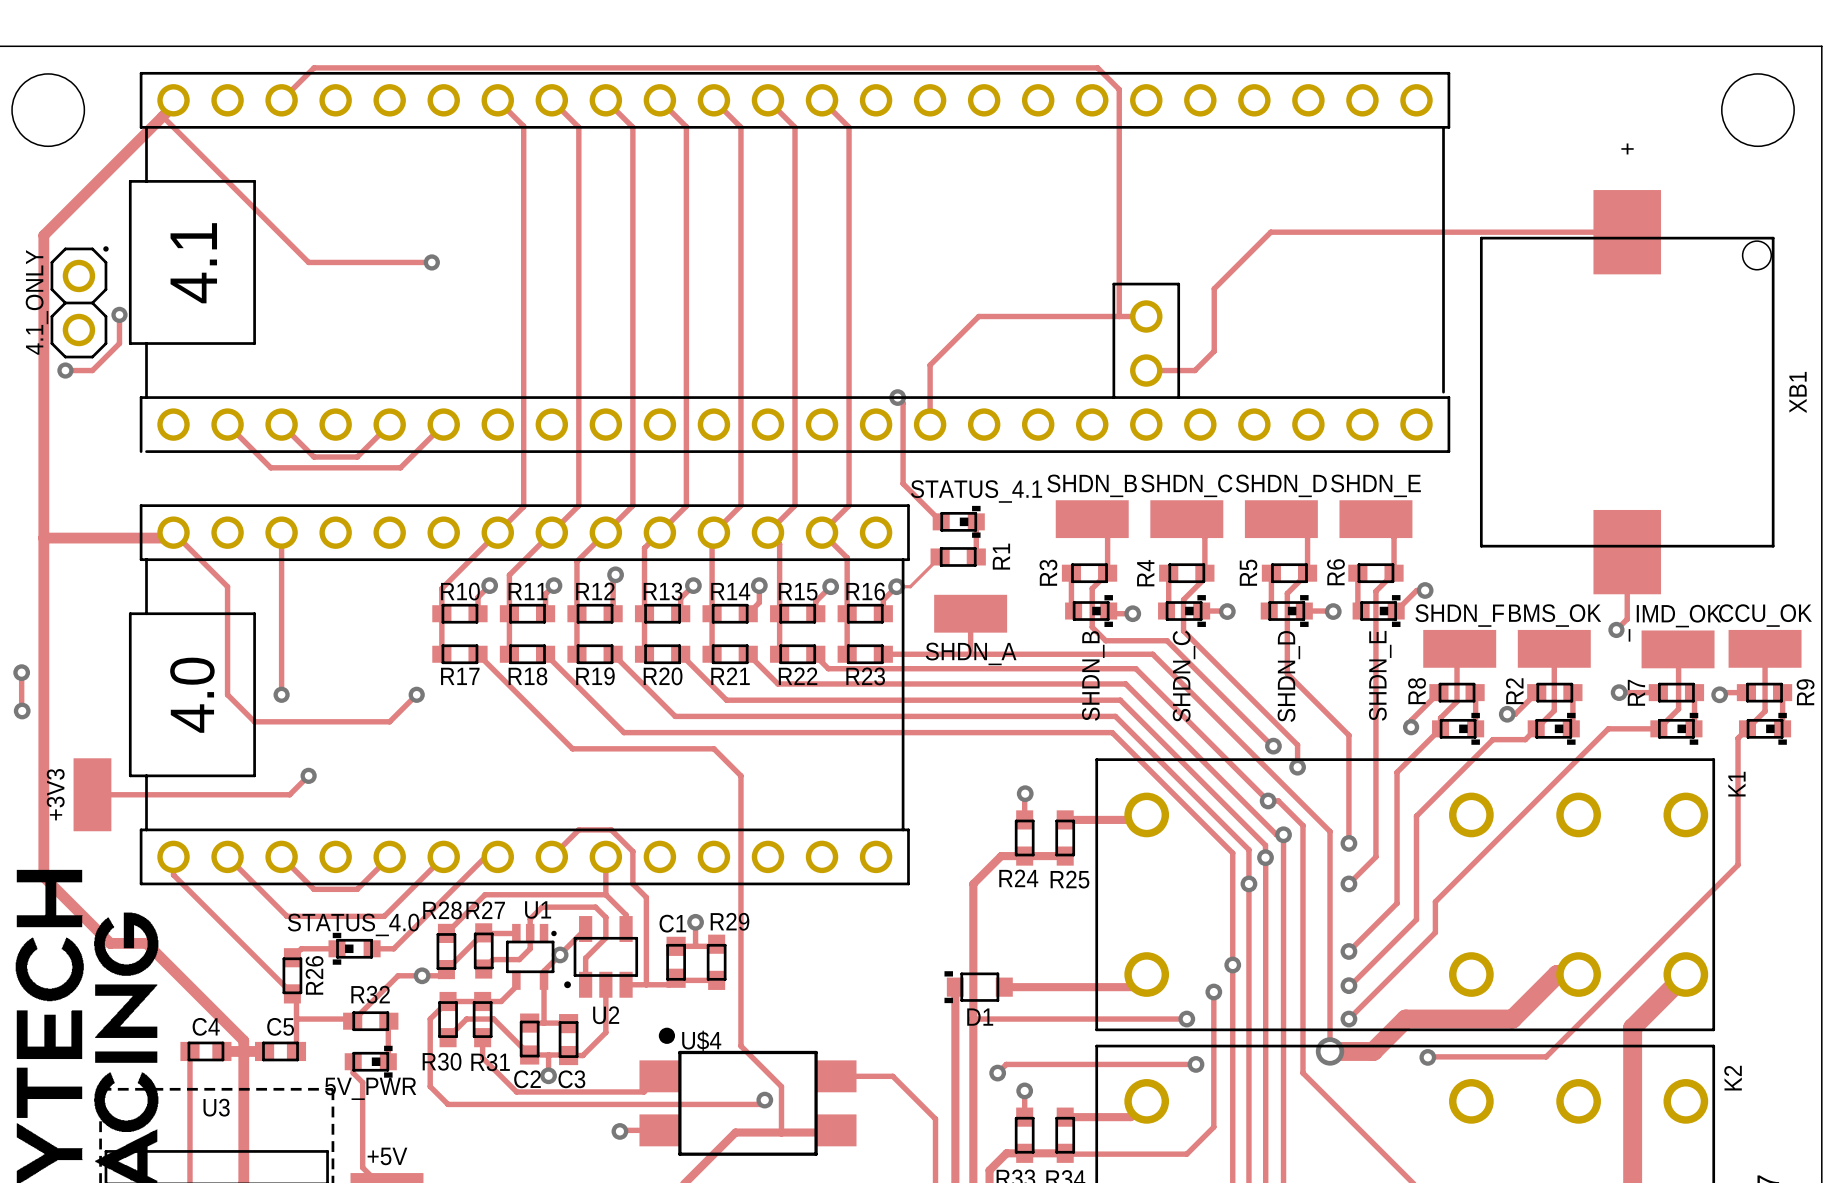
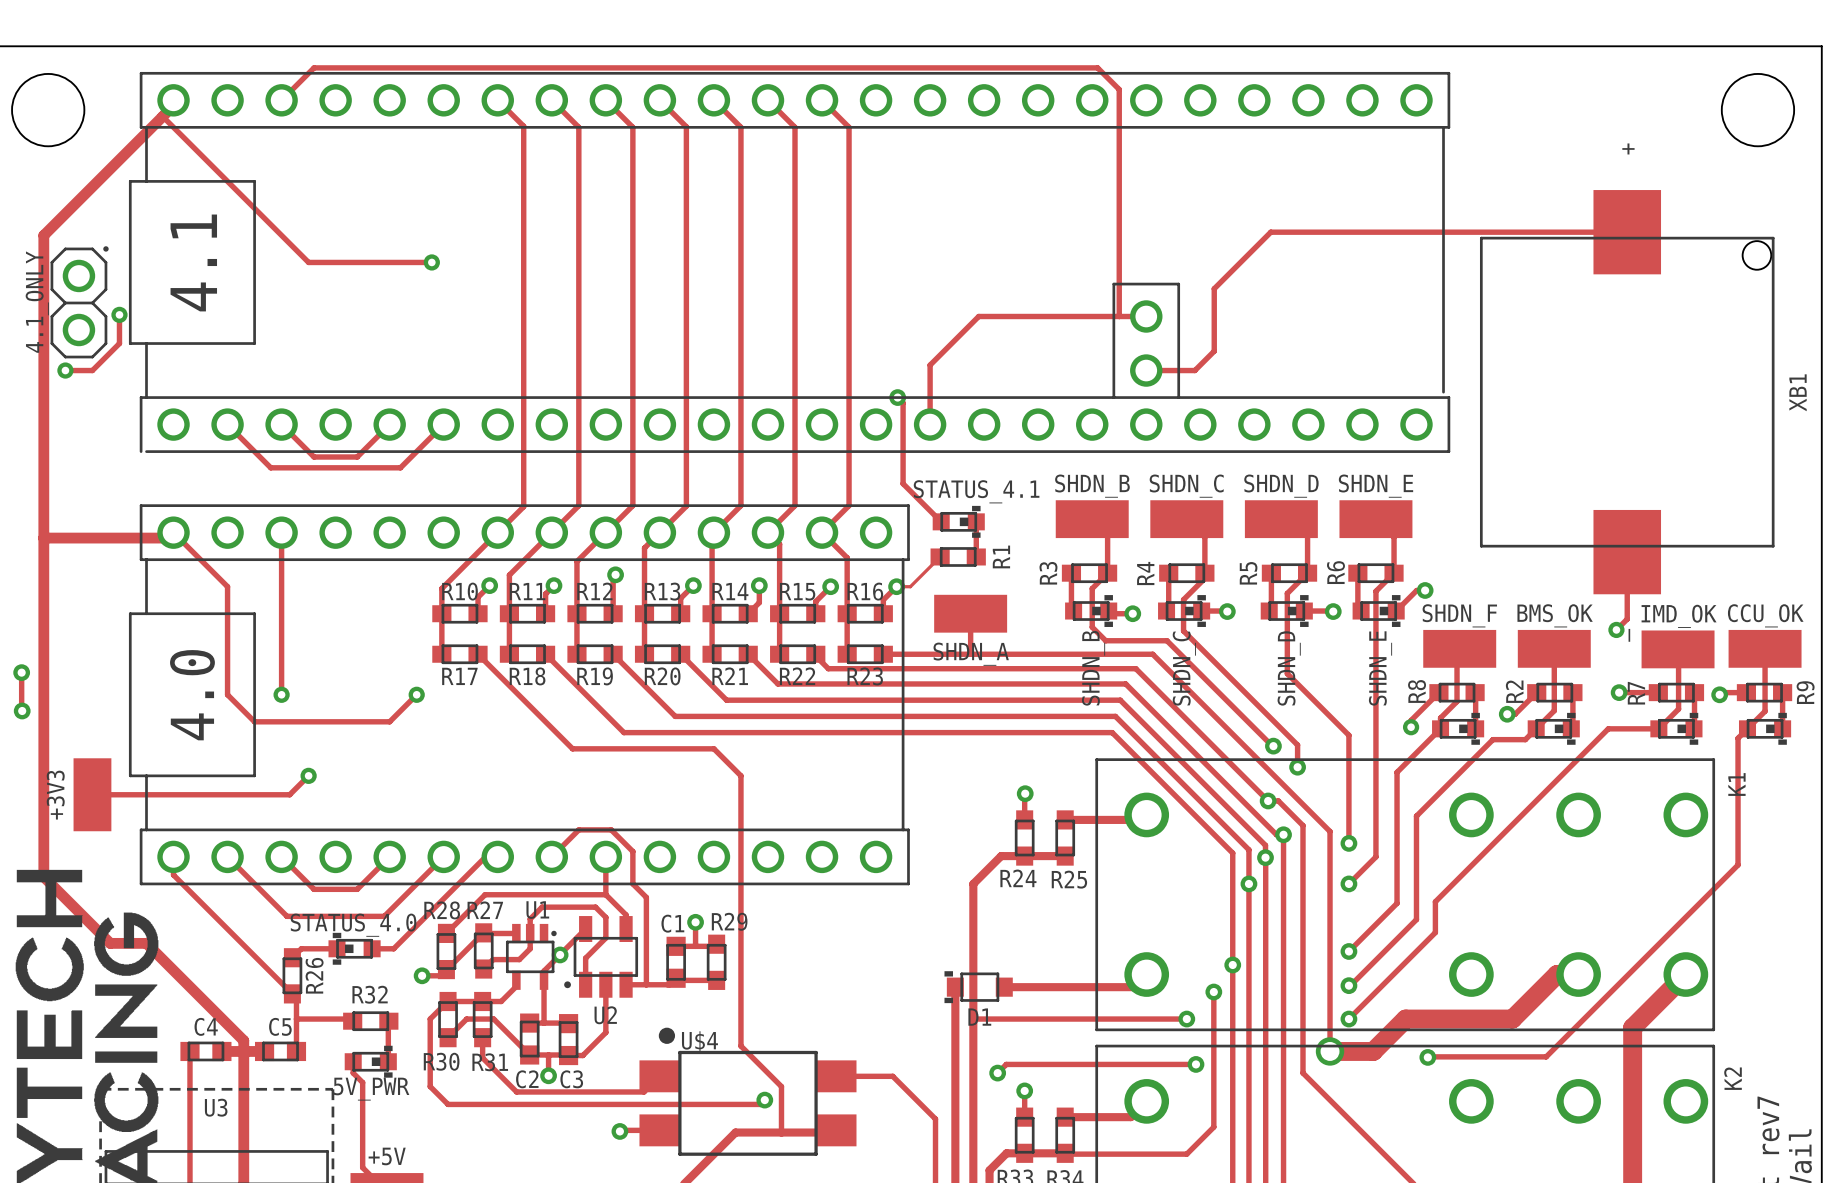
track: (422, 975) (398, 975) (352, 1021) -> none

